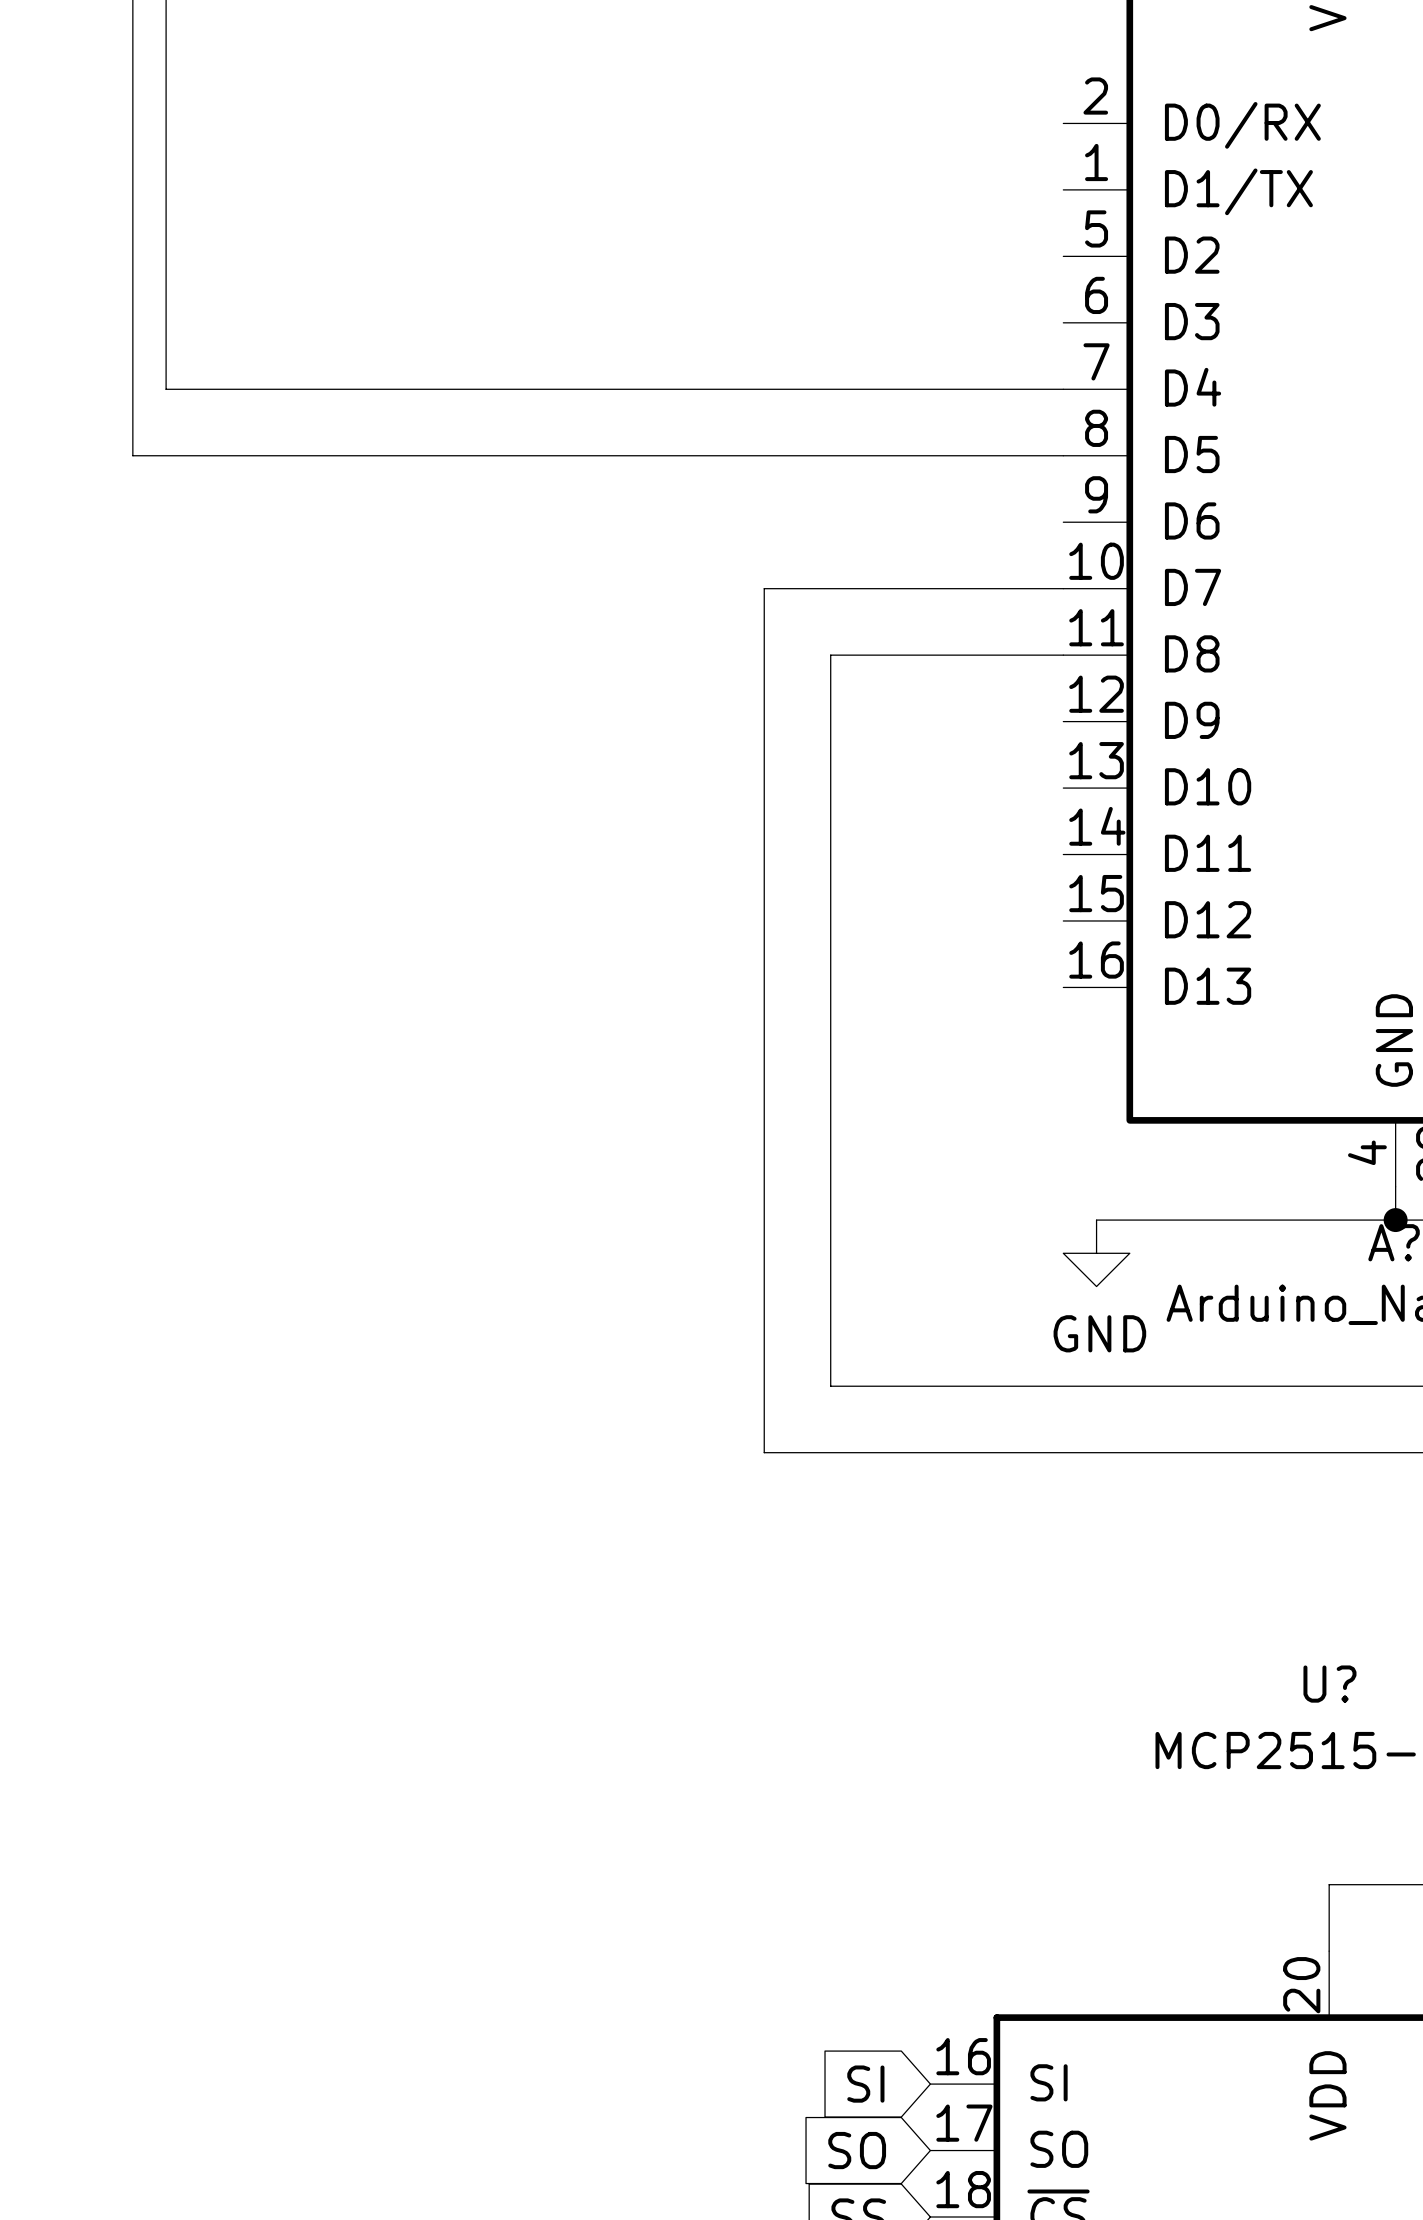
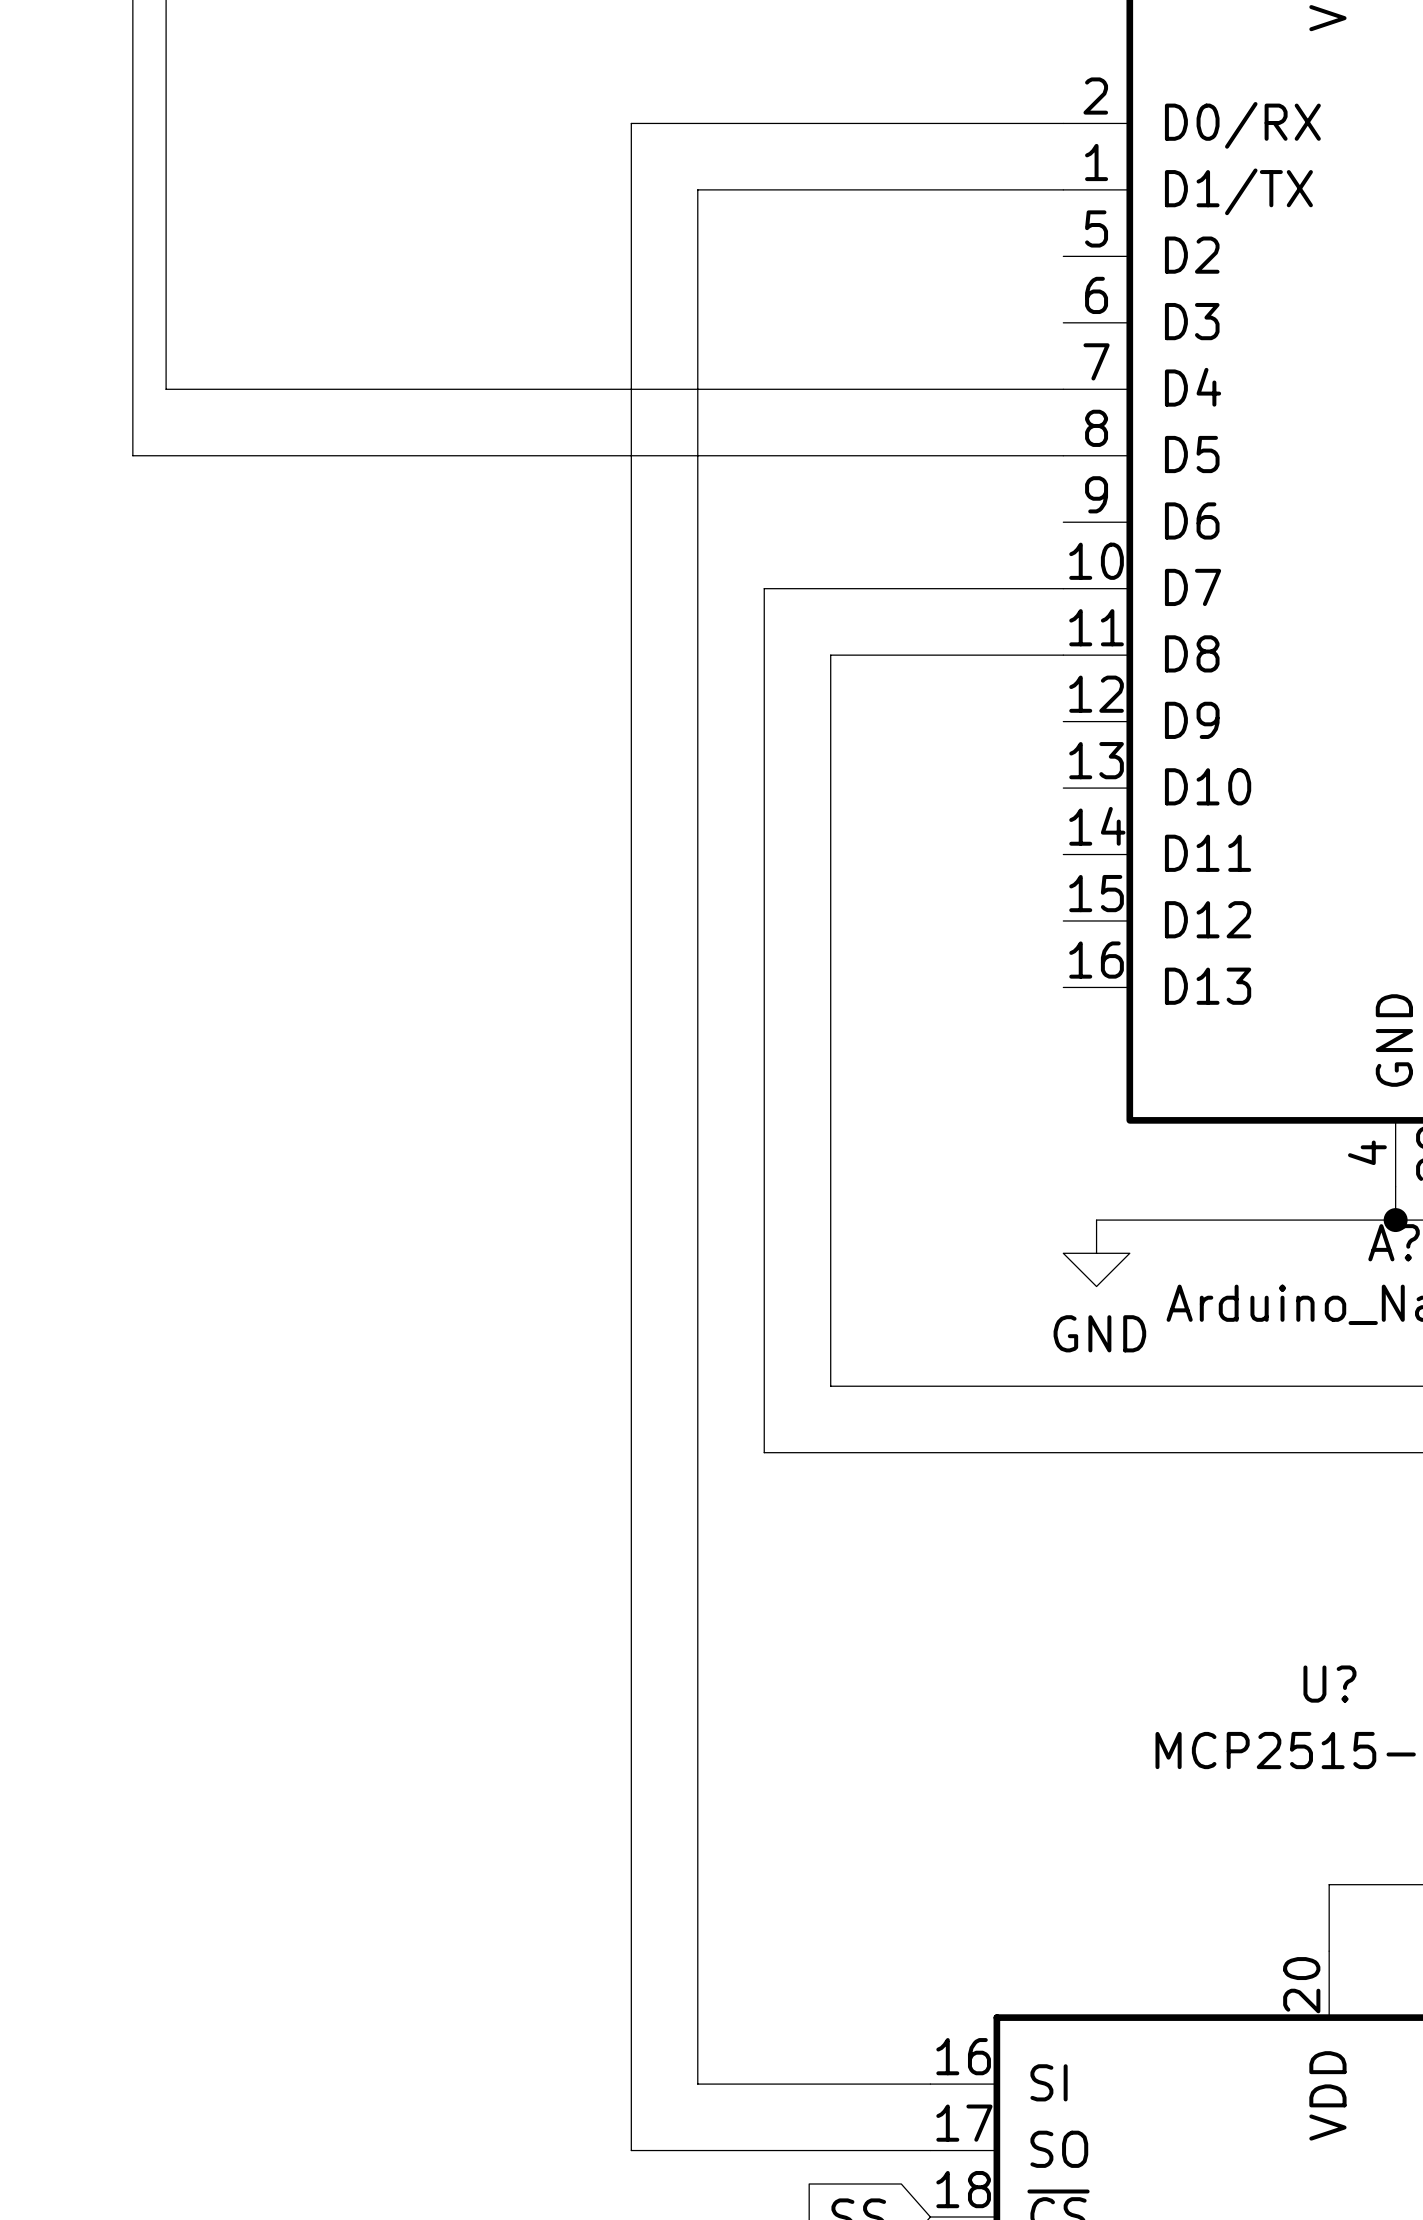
wire: none -> (1063, 123) (631, 123) (631, 2150) (930, 2150)
wire: none -> (1063, 189) (697, 189) (697, 2084) (930, 2084)
global label: SI (865, 2084) -> none
global label: SO (857, 2150) -> none

